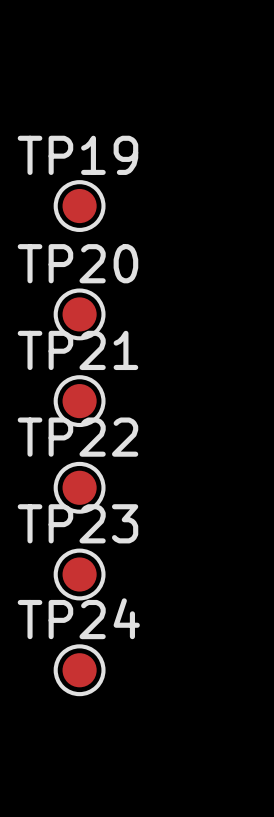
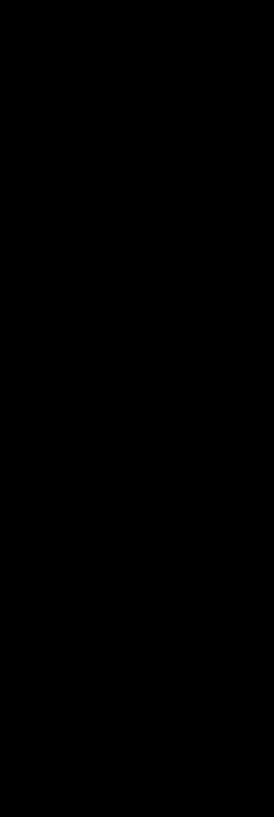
TP19: (79, 206) -> none
TP20: (79, 314) -> none
TP21: (79, 401) -> none
TP22: (79, 487) -> none
TP23: (79, 574) -> none
TP24: (79, 670) -> none

